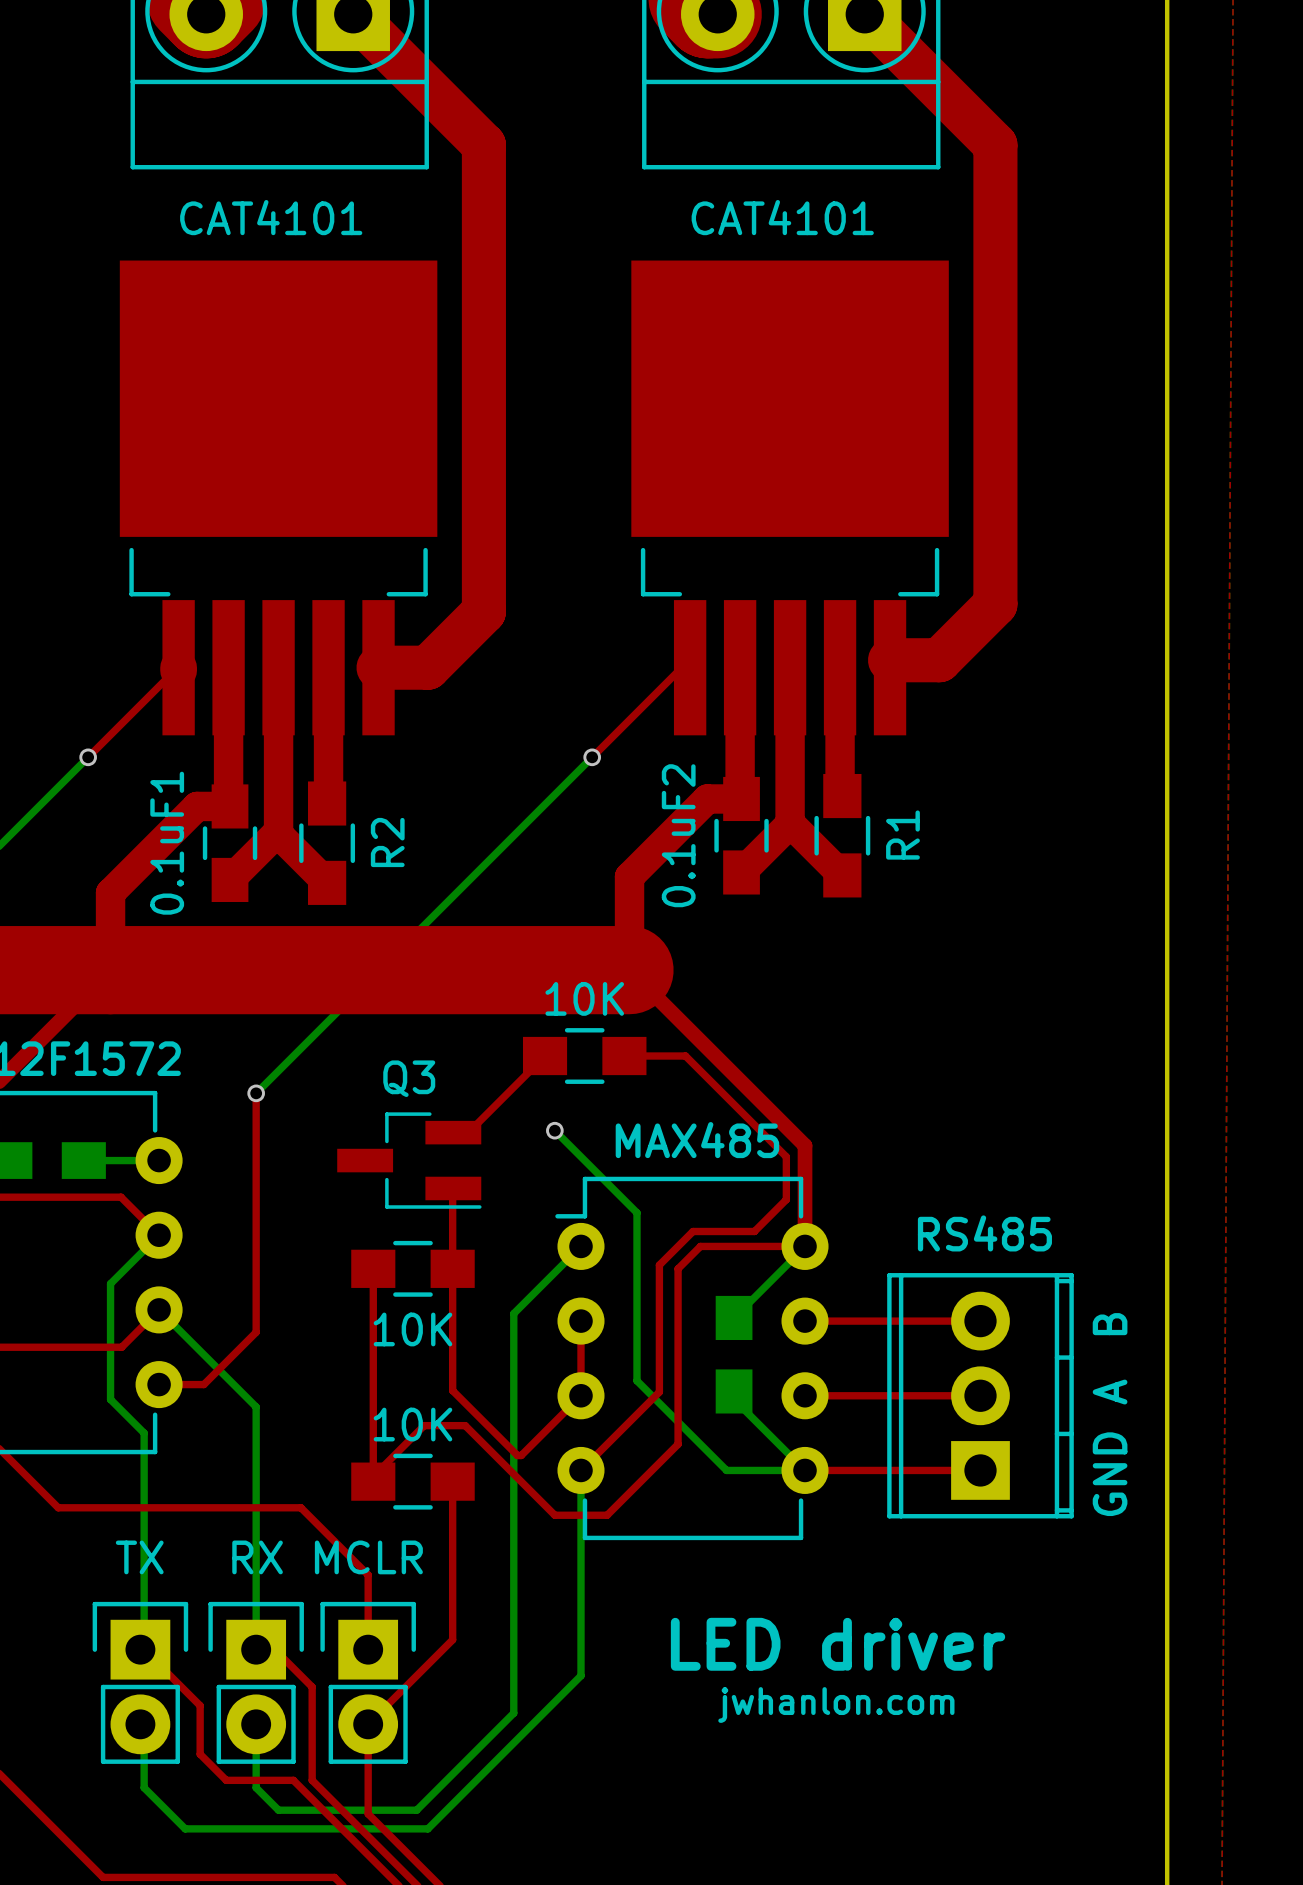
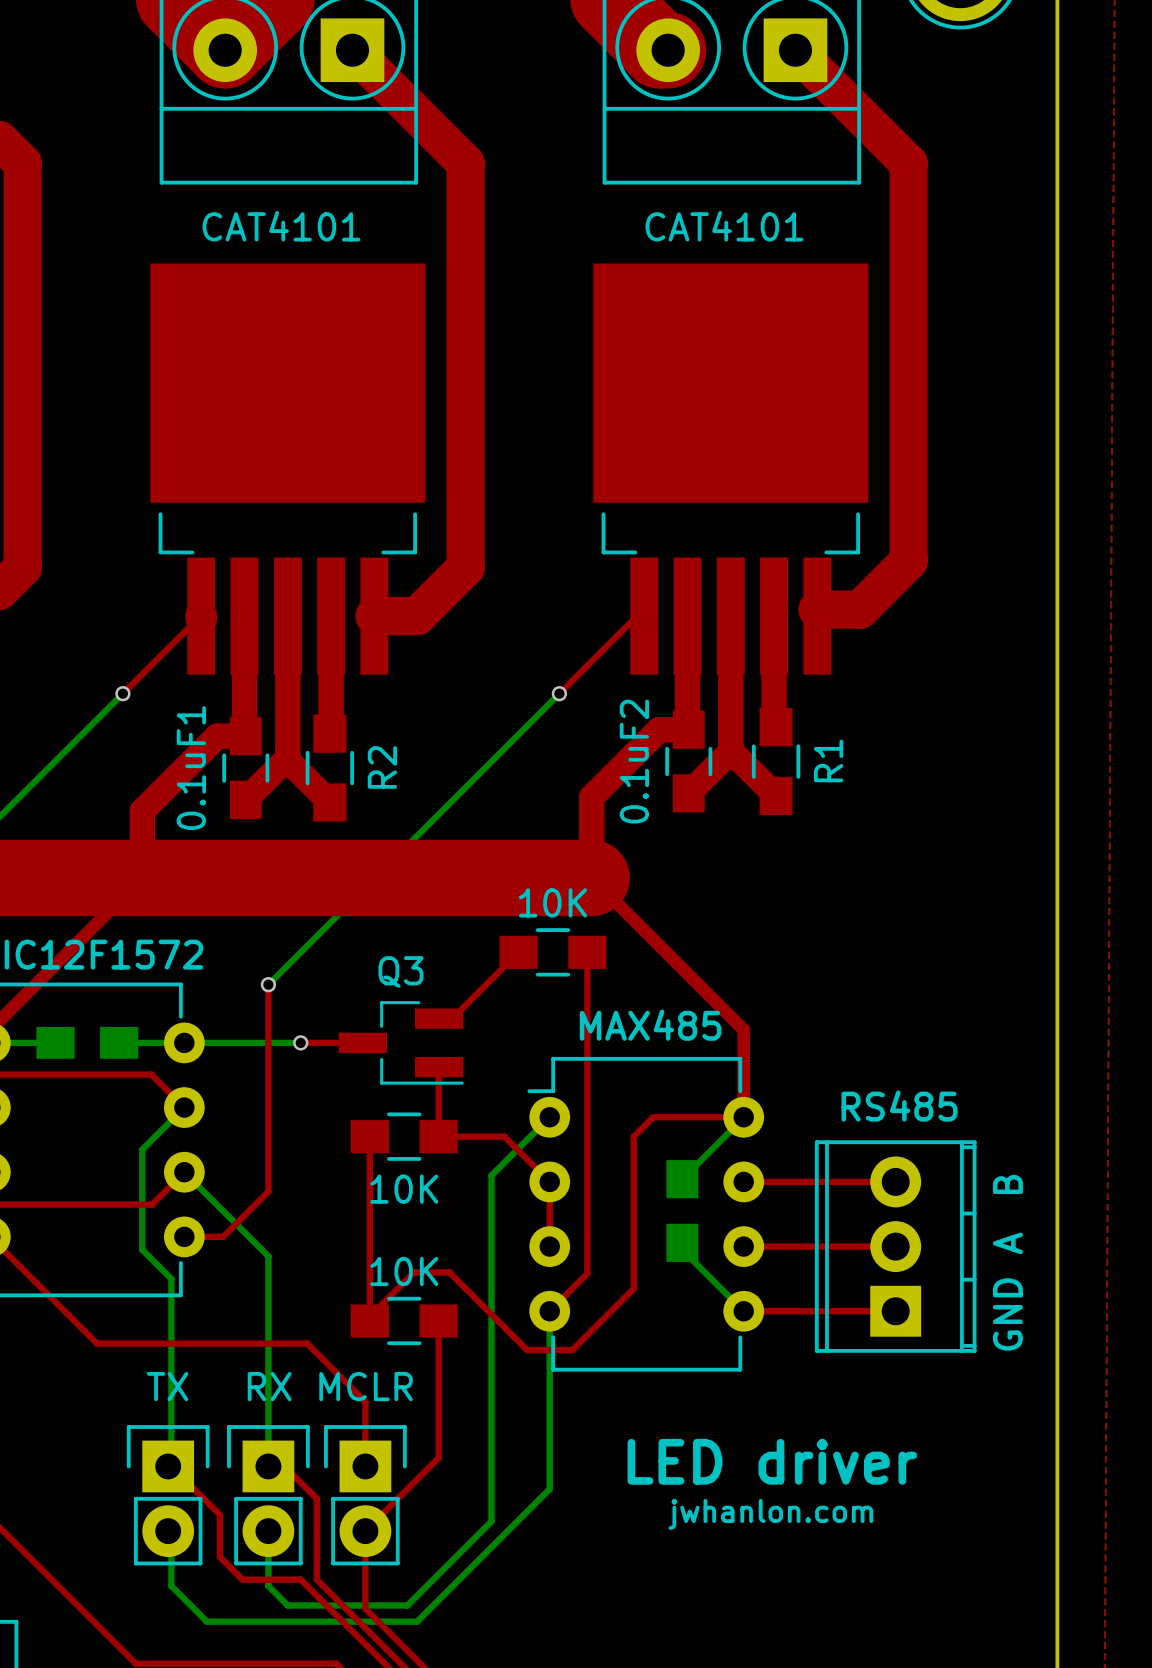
top track: (624, 1056) (685, 1056) (786, 1156) (786, 1199) (754, 1231) (693, 1231) (659, 1265) (659, 1392) (624, 1427) -> (587, 952) (587, 1273)
bottom track: (554, 1130) (637, 1212) (637, 1380) (726, 1470) (805, 1470) -> none
via: (554, 1130) -> none
bottom track: none -> (184, 1042) (300, 1042)
top track: none -> (300, 1042) (362, 1042)
via: none -> (300, 1042)
top track: (452, 1268) (452, 1390) (517, 1455) (521, 1455) (580, 1395) -> (438, 1136) (504, 1136) (549, 1181)

